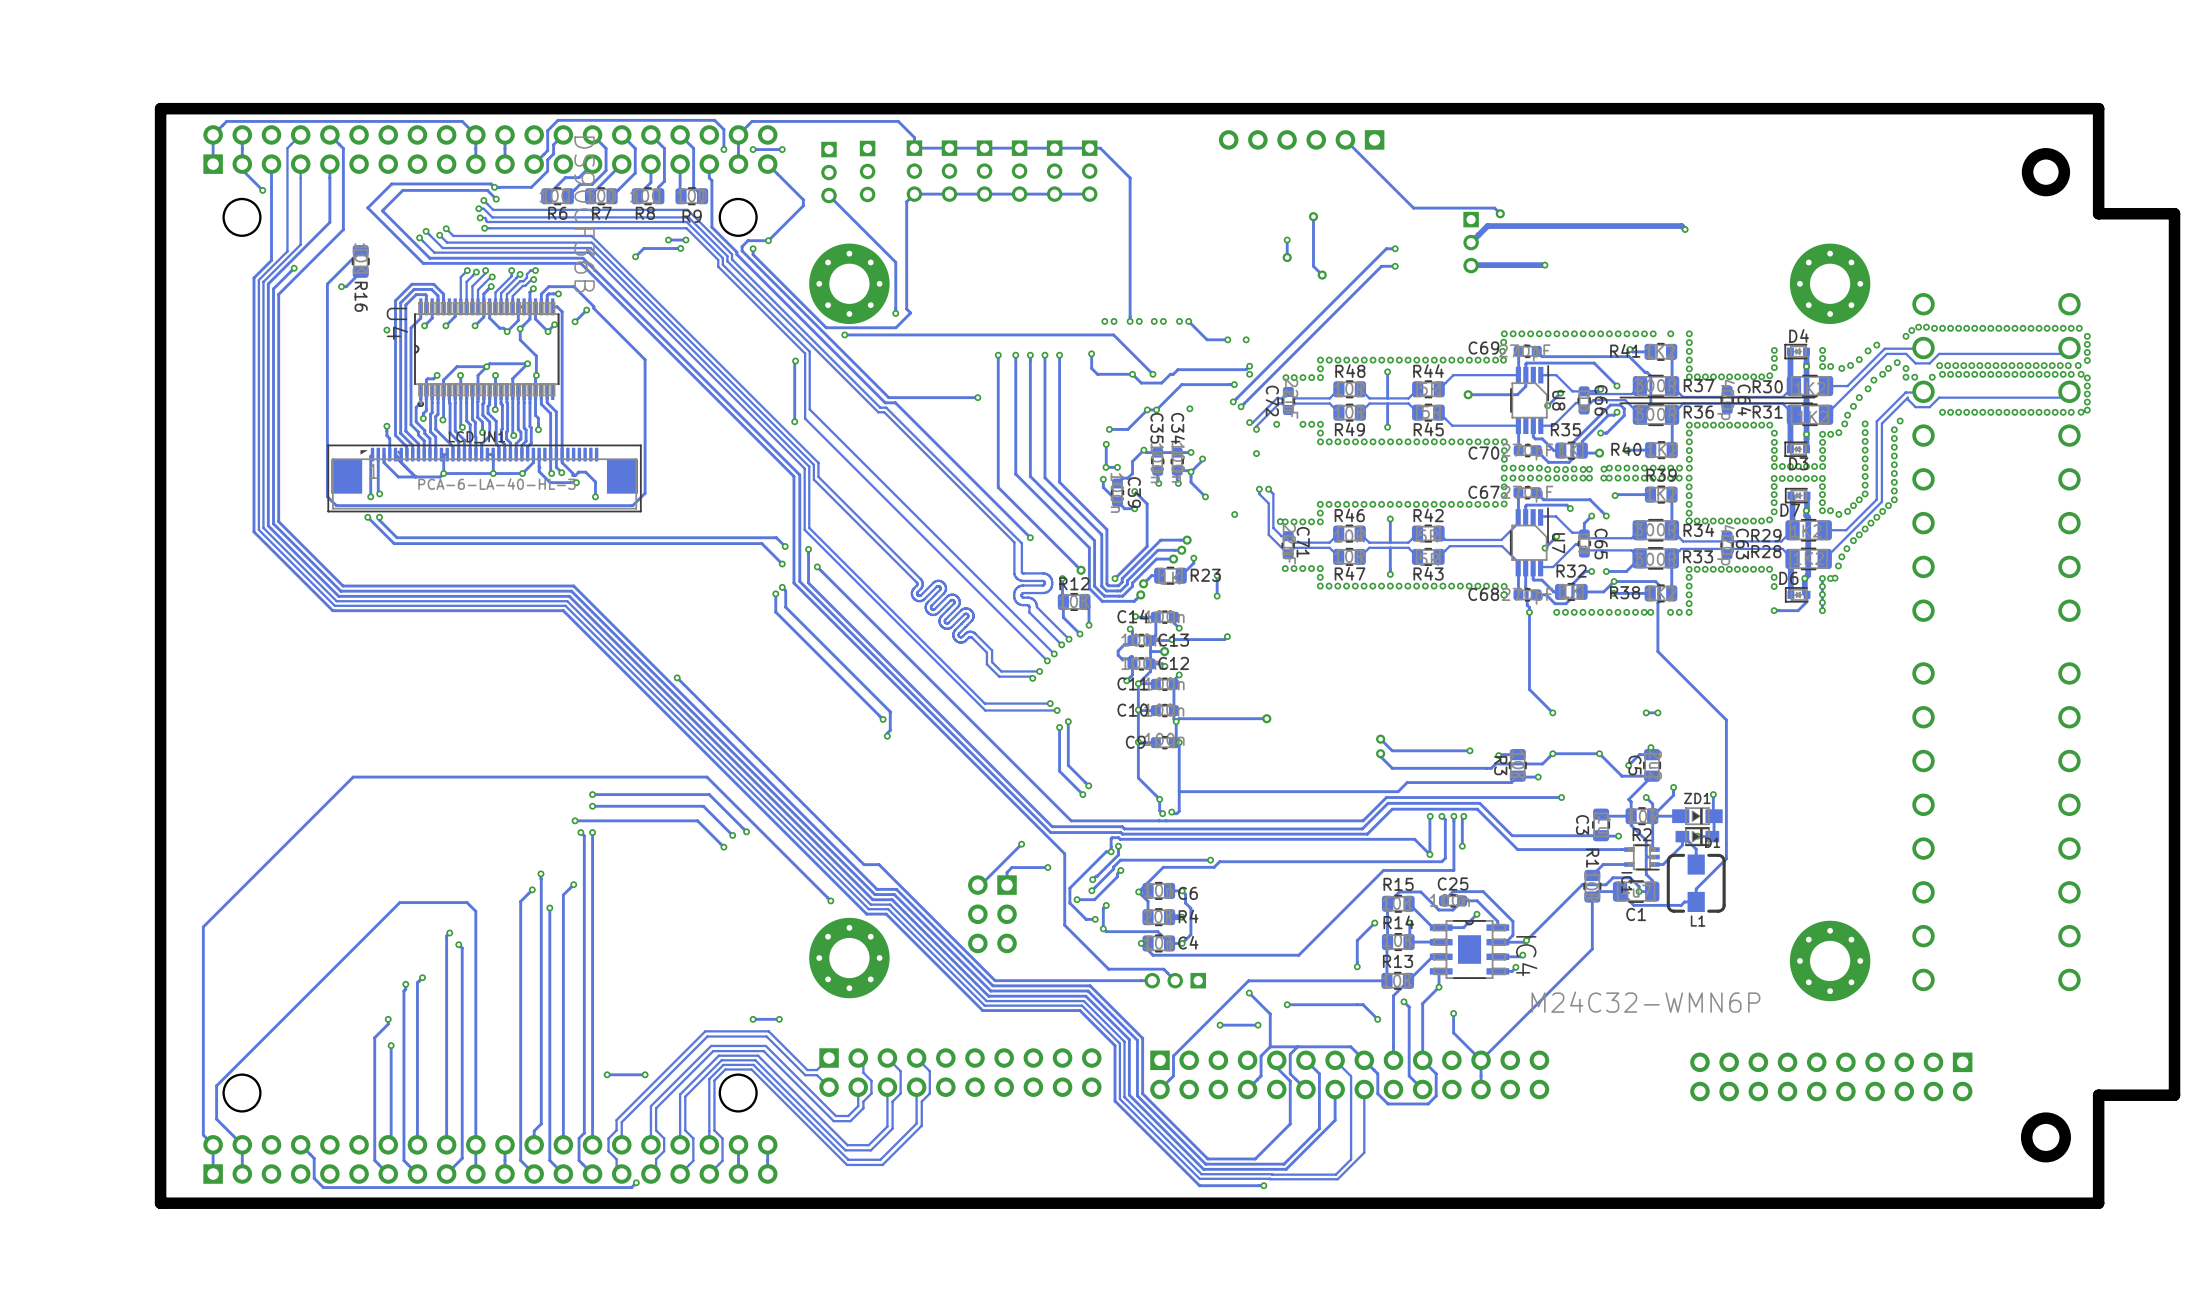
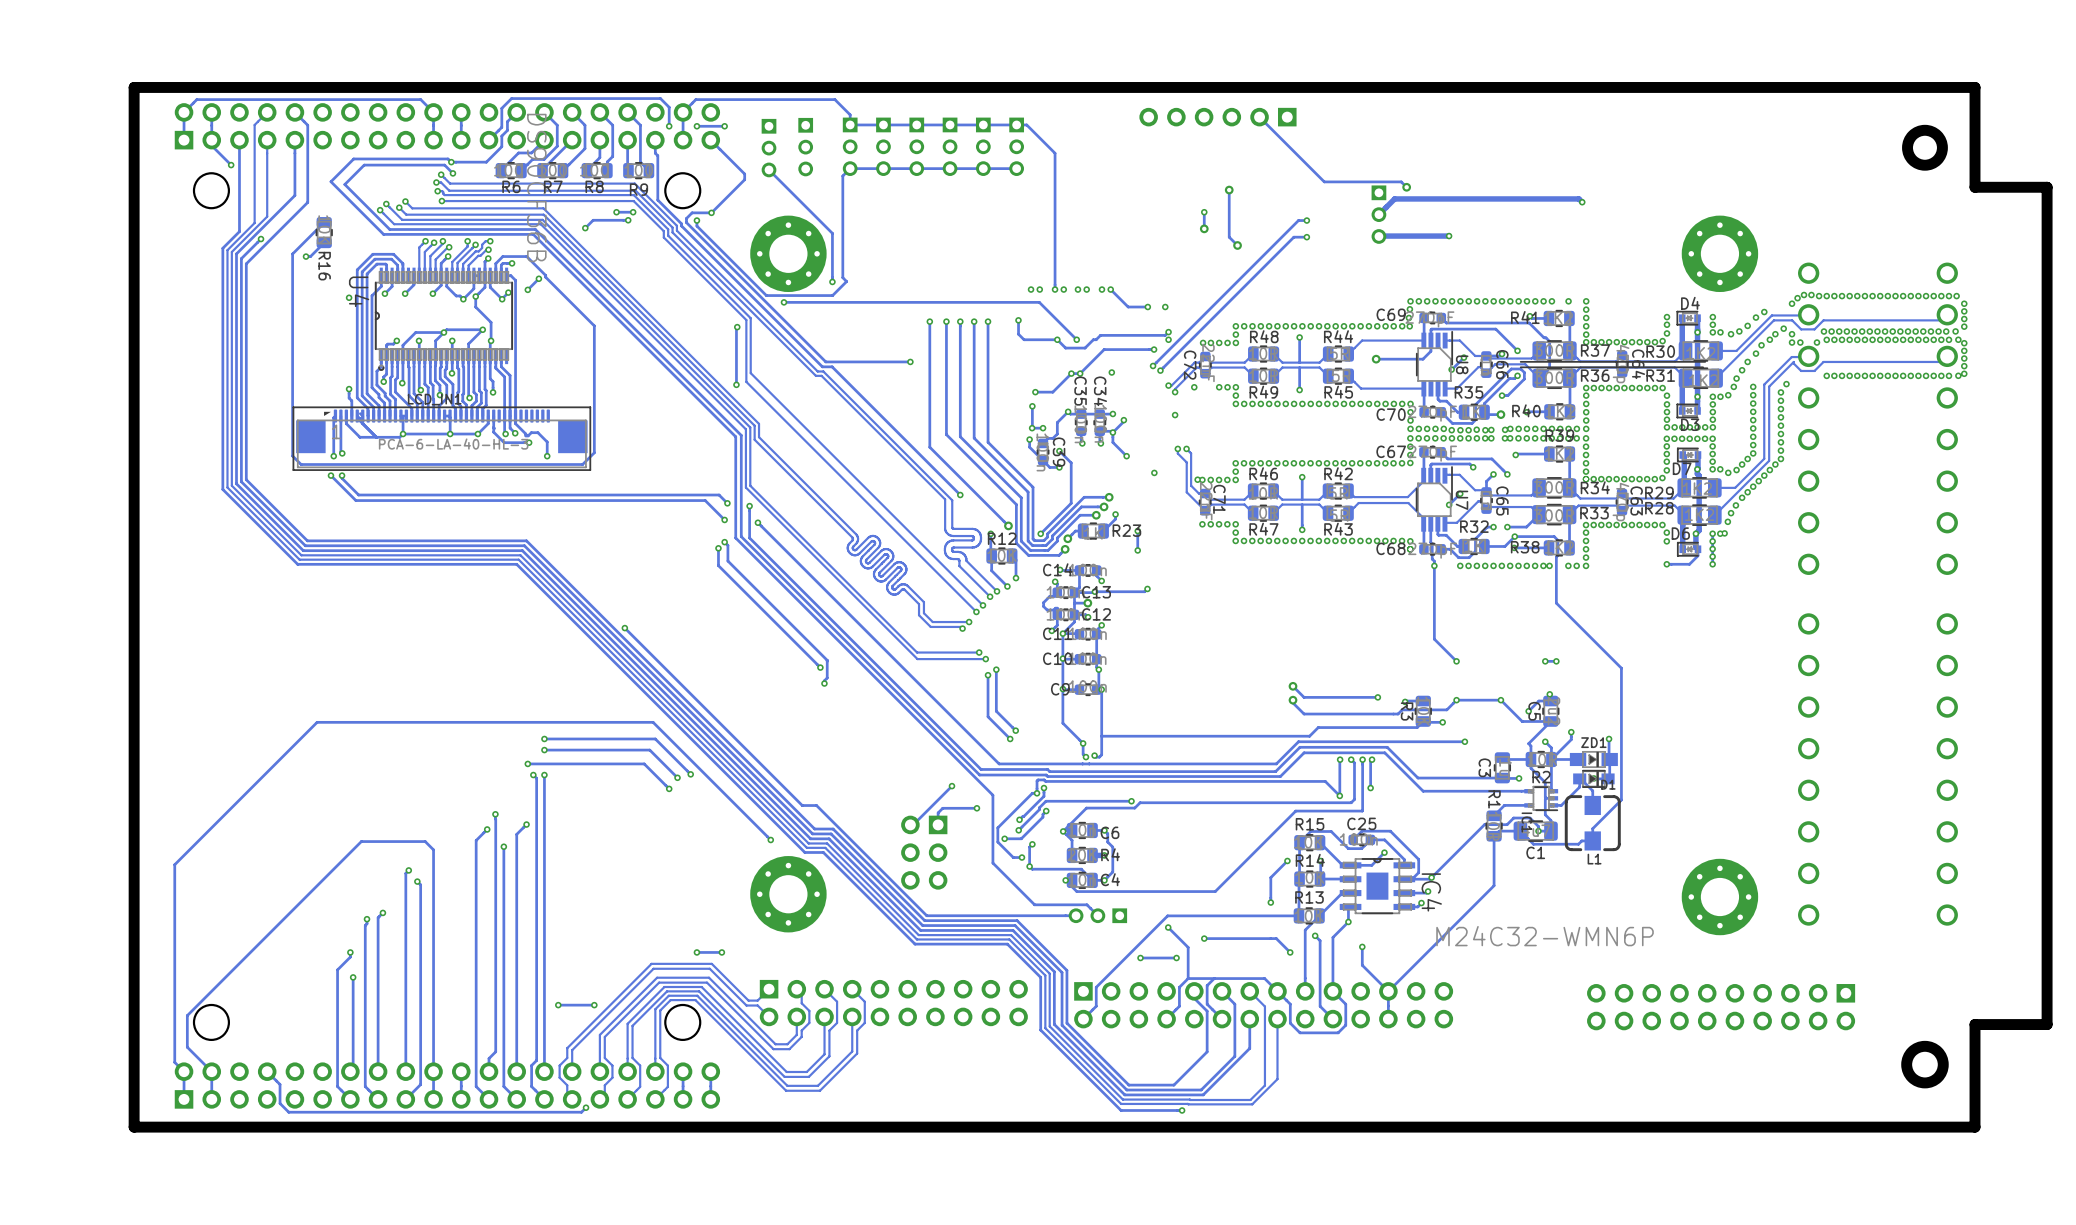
track: (1266, 718) (1179, 718) (1176, 721) -> none
via: (1266, 718) -> none

